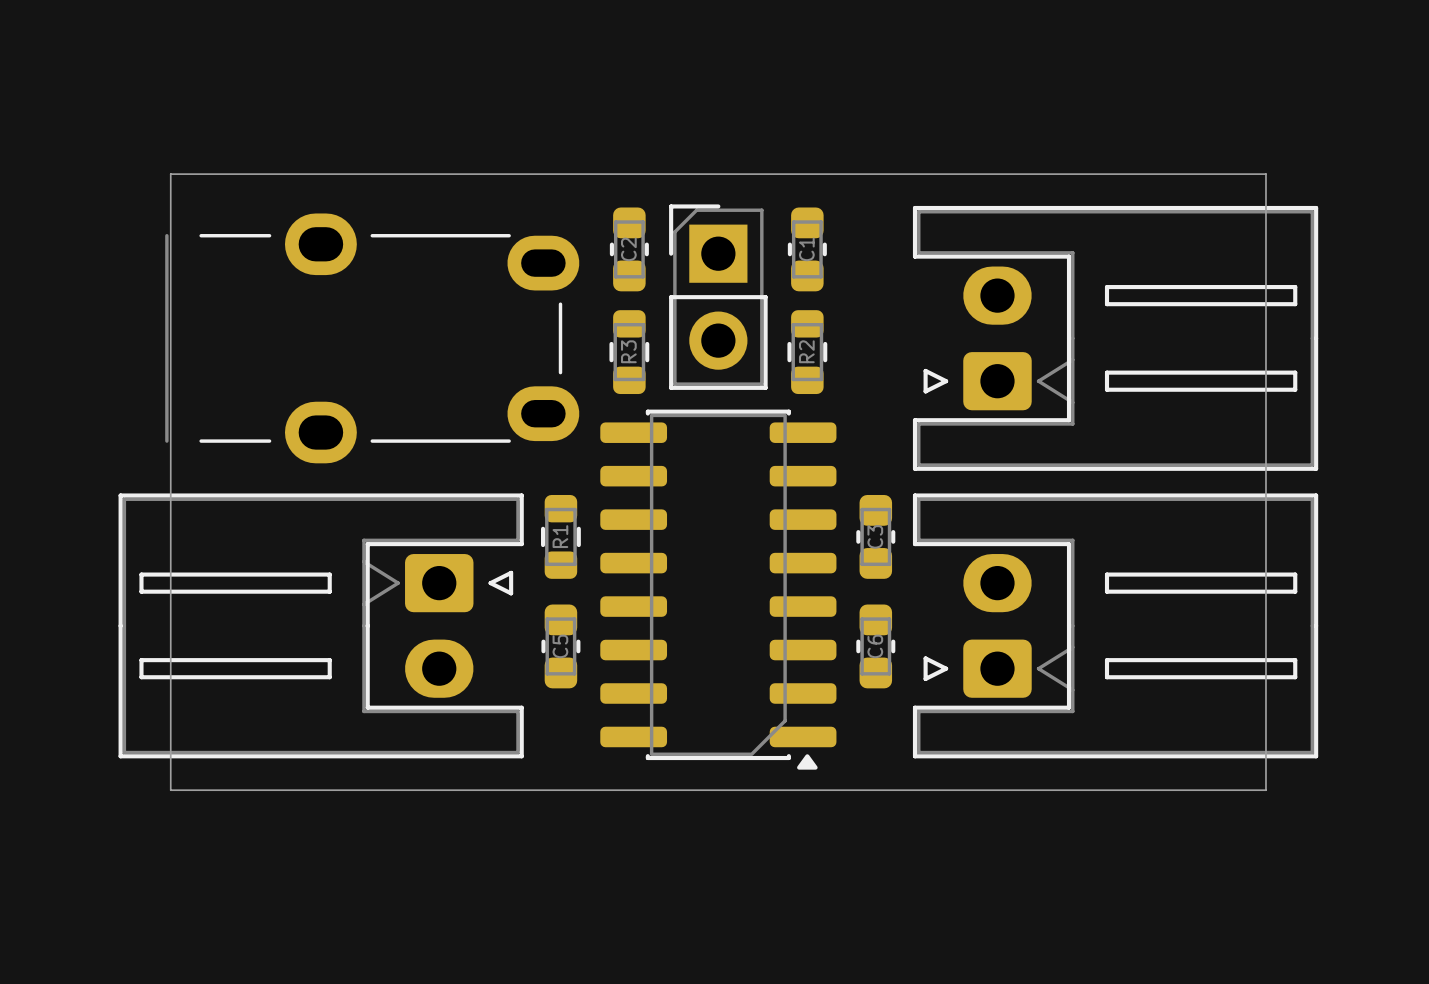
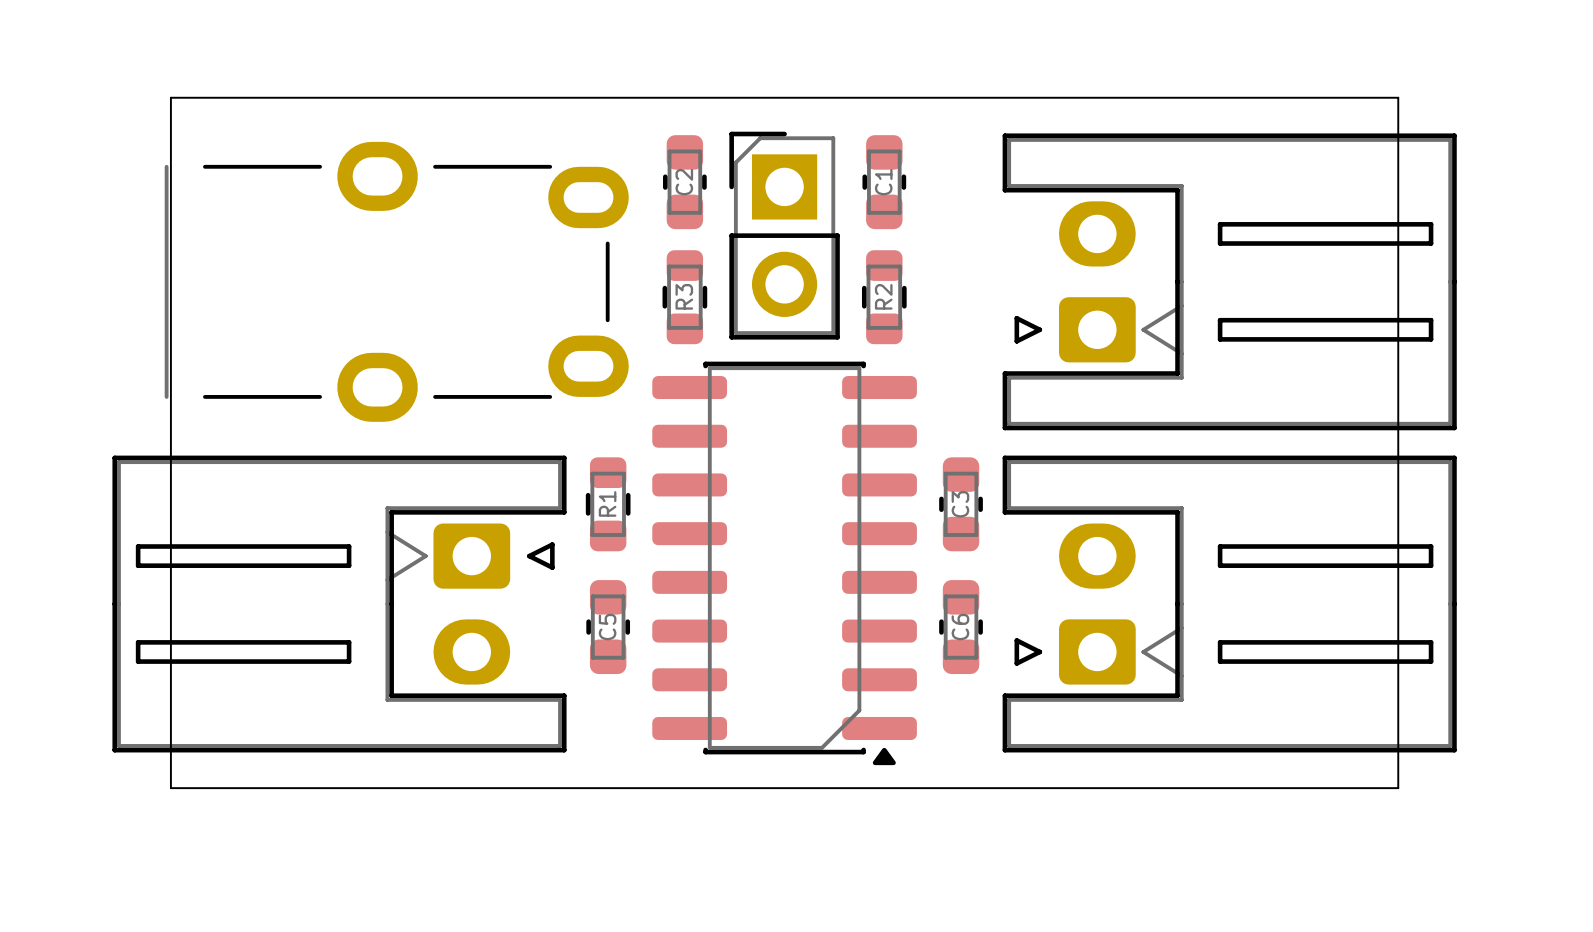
part footprint: [165, 213, 580, 464] -> [164, 141, 629, 422]

